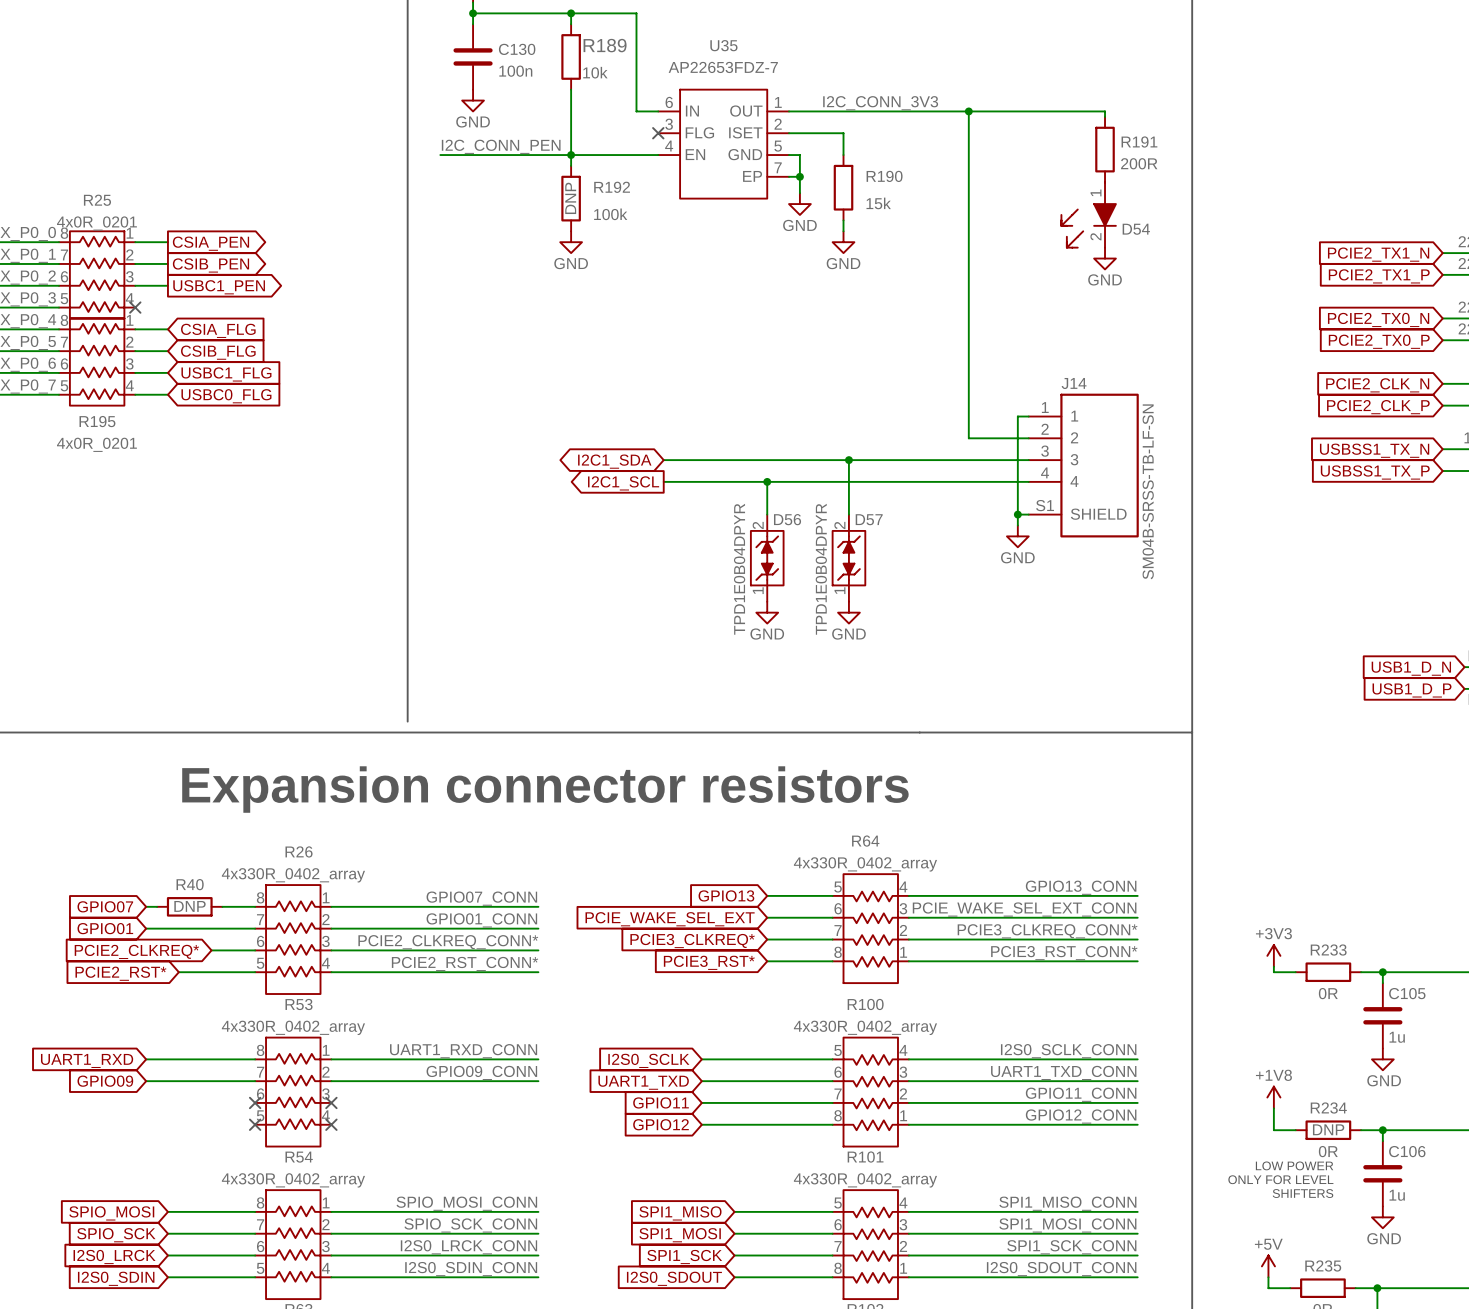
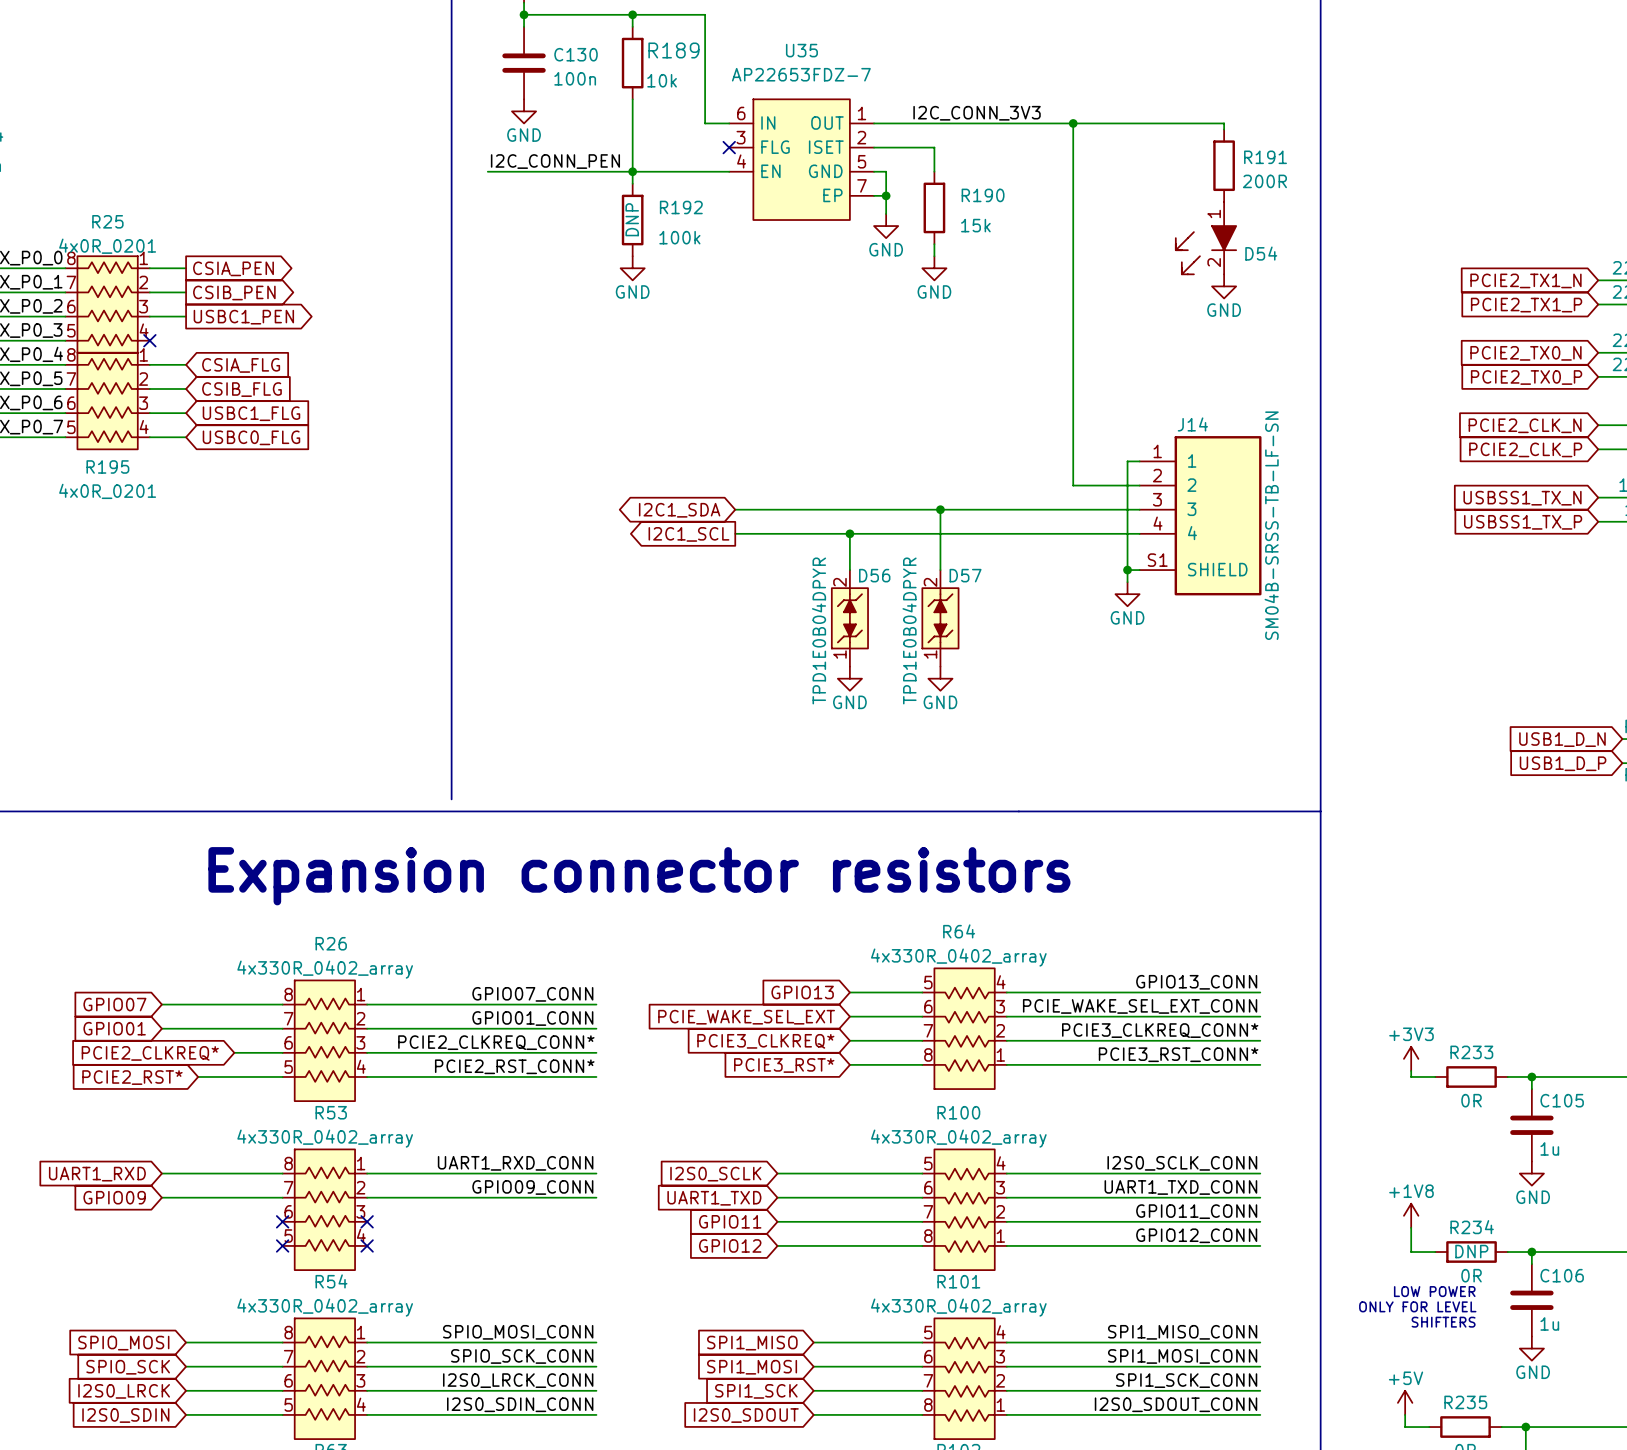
R40: DNP (189, 906) -> none

